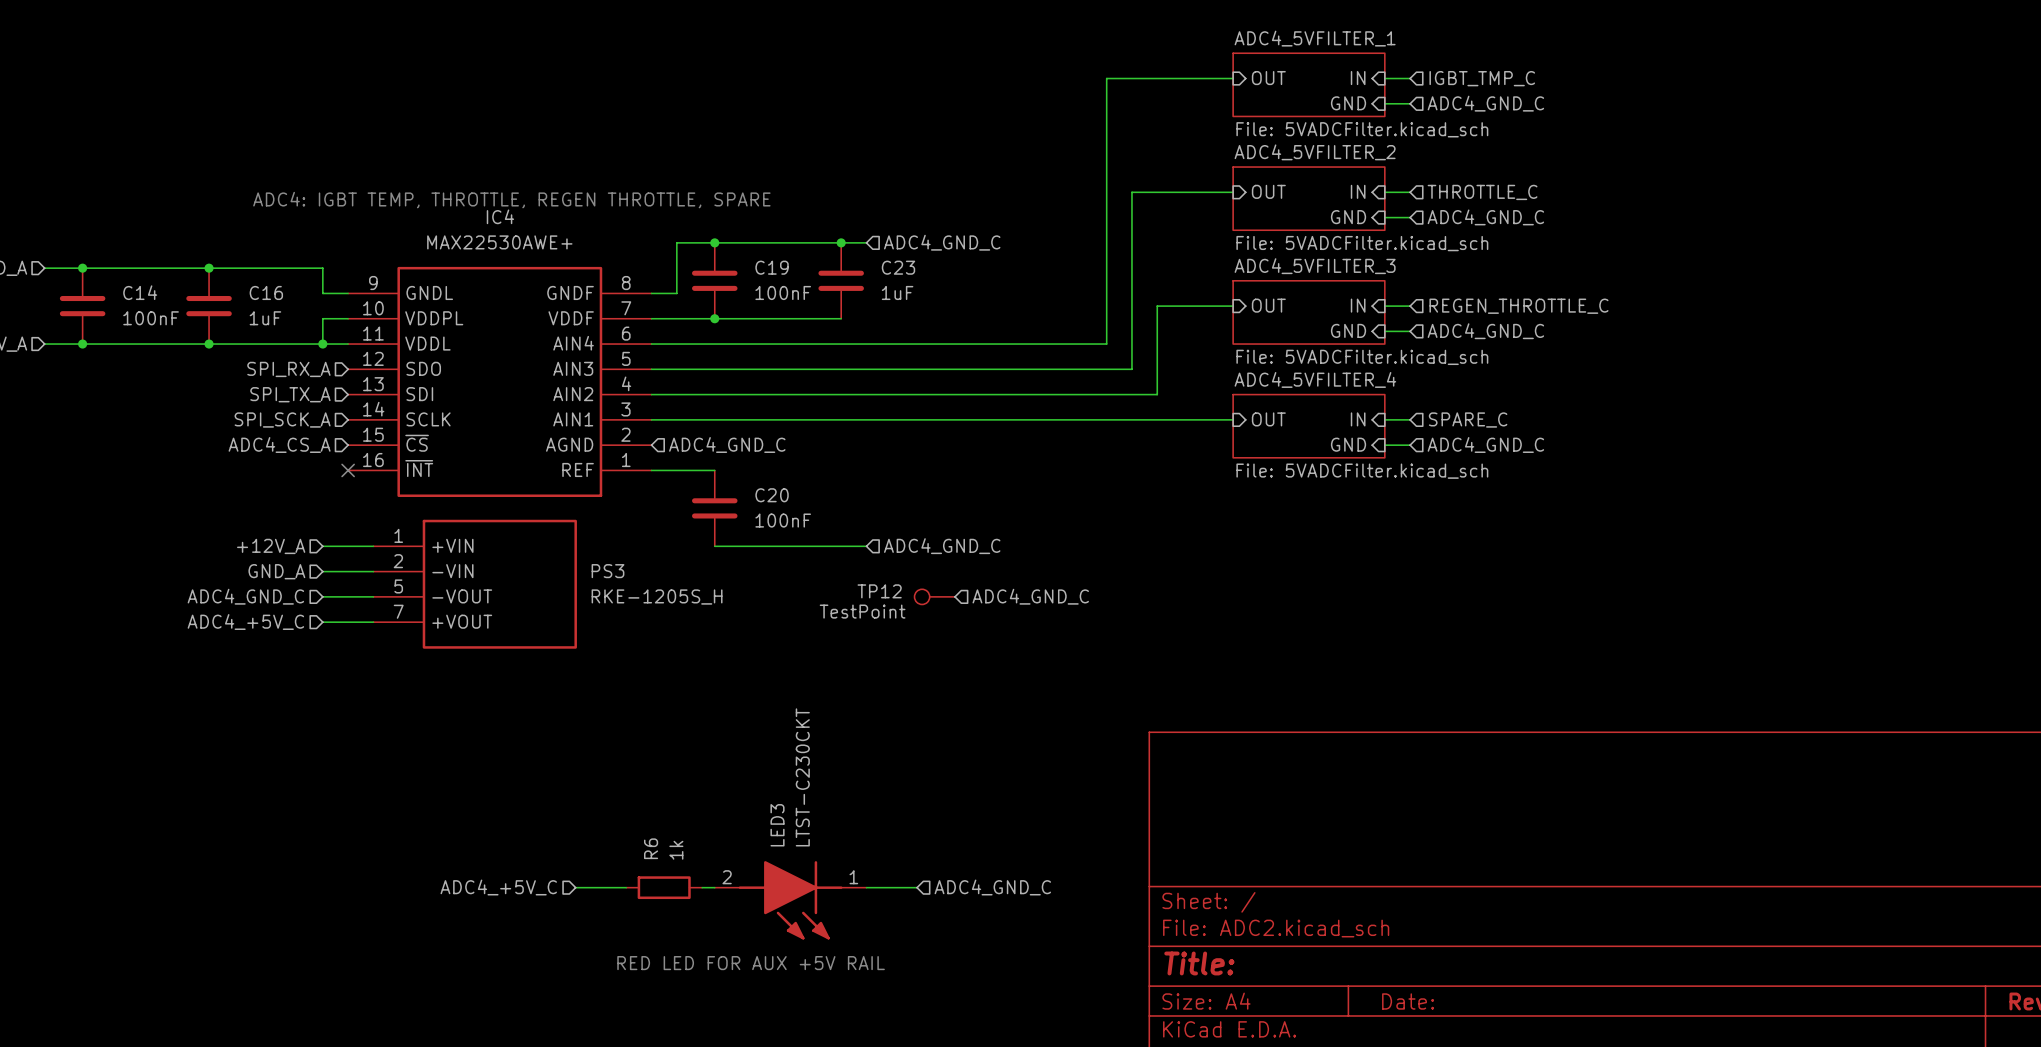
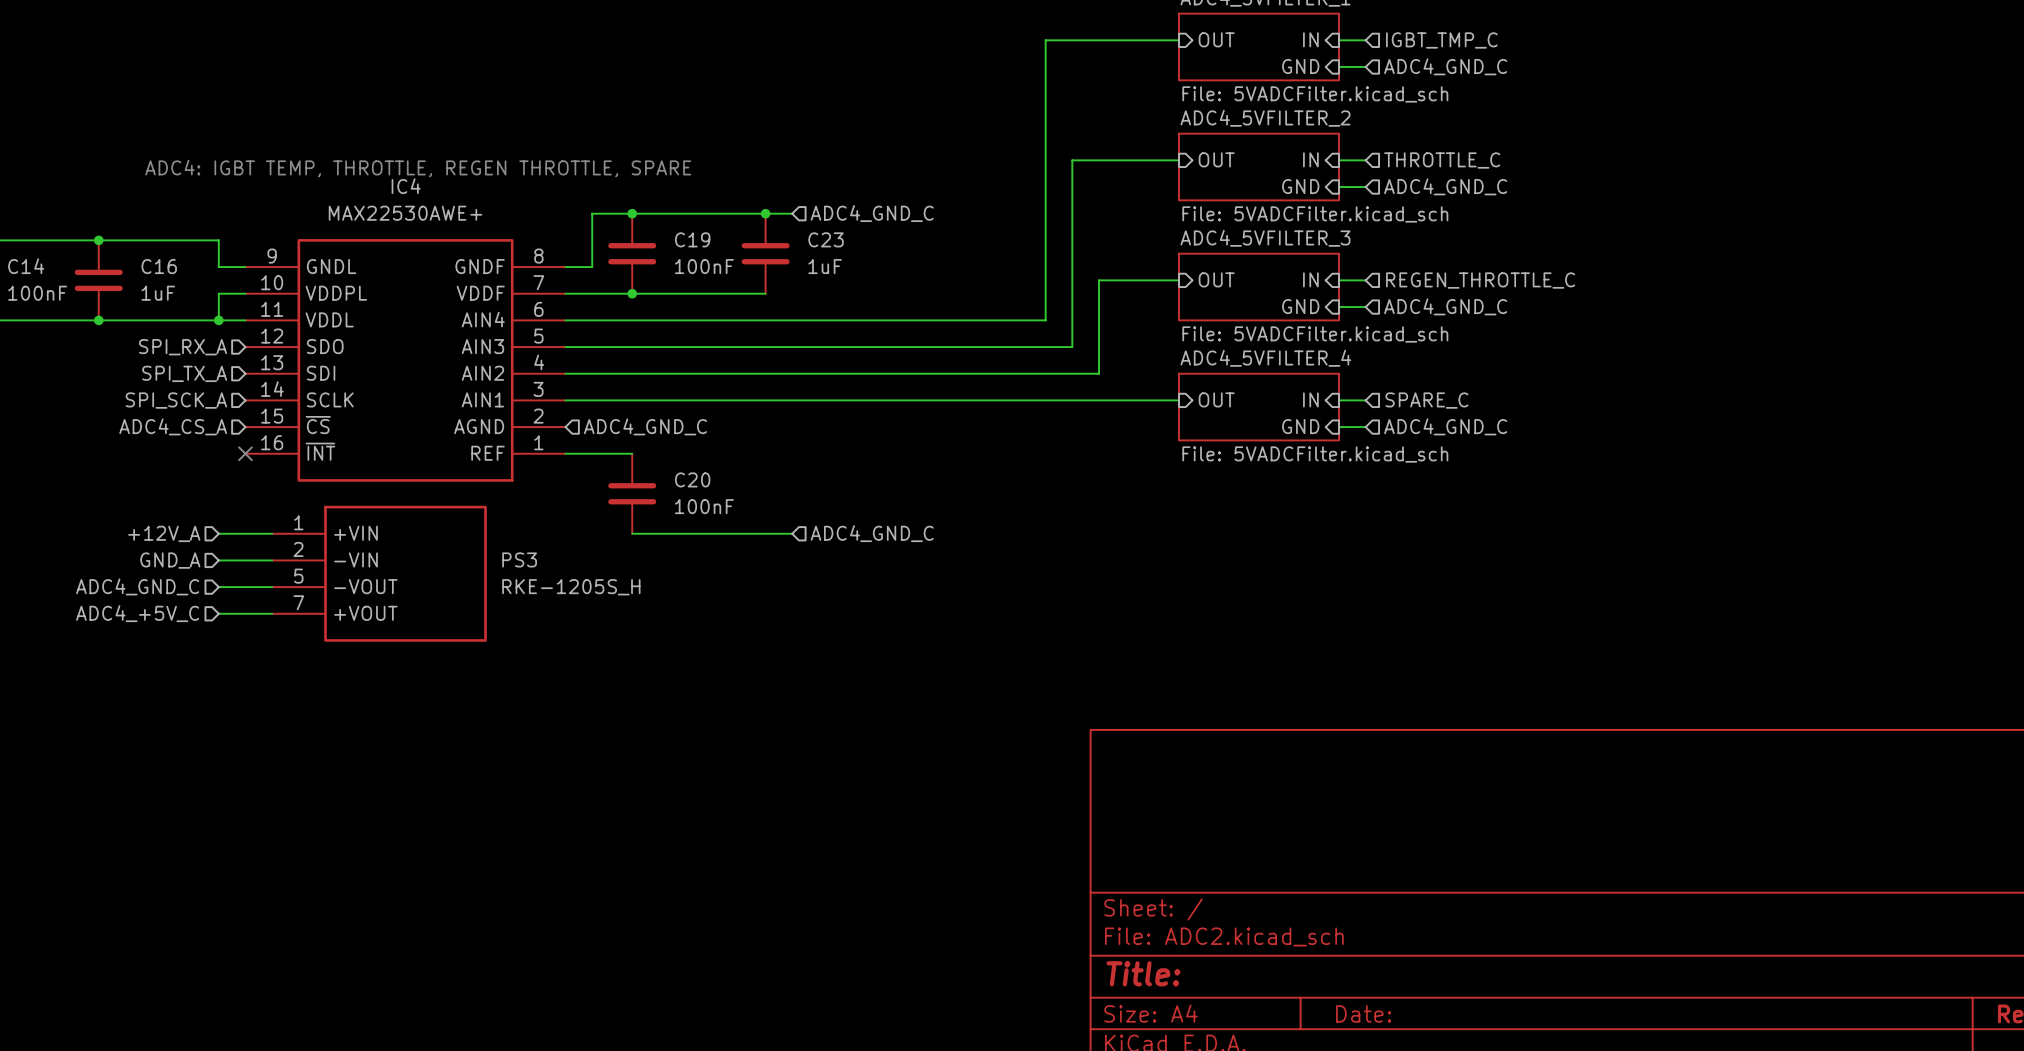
TP12: TestPoint (934, 596) -> none
hierarchical label: ADC4_GND_C (1030, 596) -> none
hierarchical label: ADC4_+5V_C (498, 887) -> none
wire: (575, 887) (626, 887) -> none
R6: 1k (664, 887) -> none
wire: (702, 887) (714, 887) -> none
wire: (866, 887) (917, 887) -> none
hierarchical label: ADC4_GND_C (992, 887) -> none
LED3: LTST-C230CKT (790, 900) -> none
text: RED LED FOR AUX +5V RAIL (751, 963) -> none

